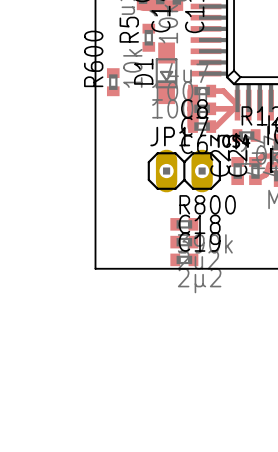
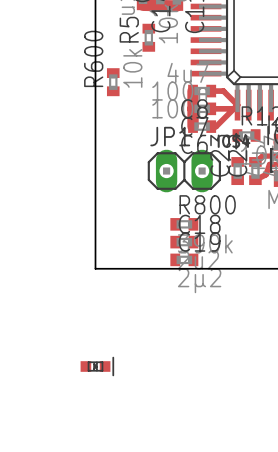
D1: (166, 73) -> none
part: none -> (97, 366)

